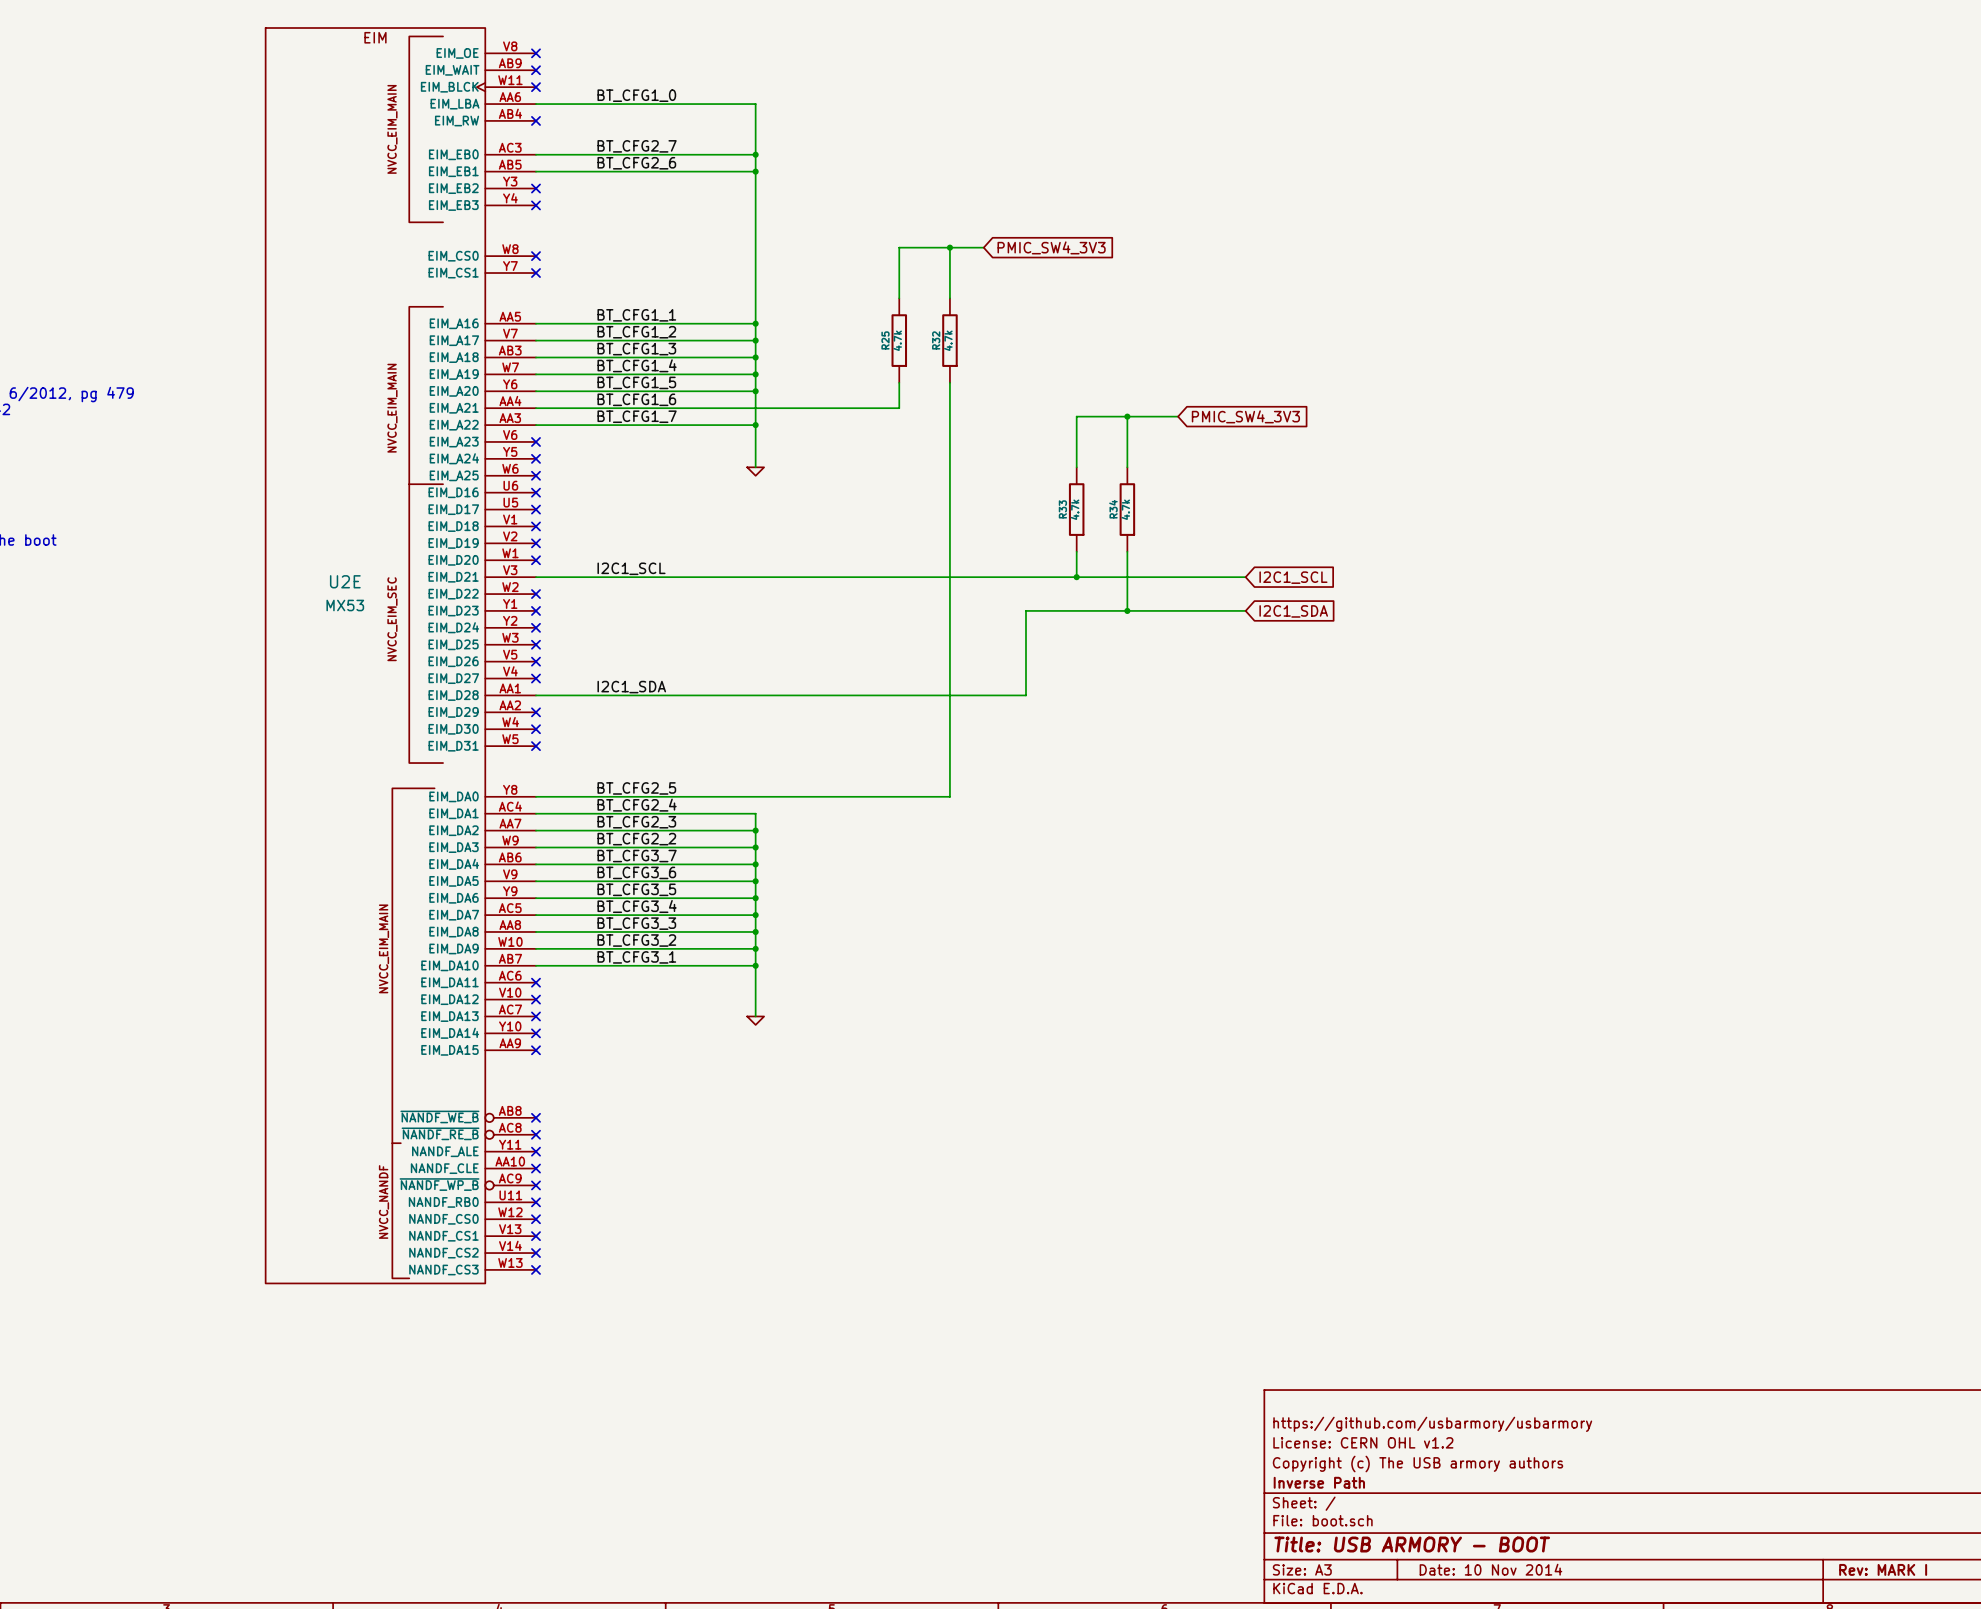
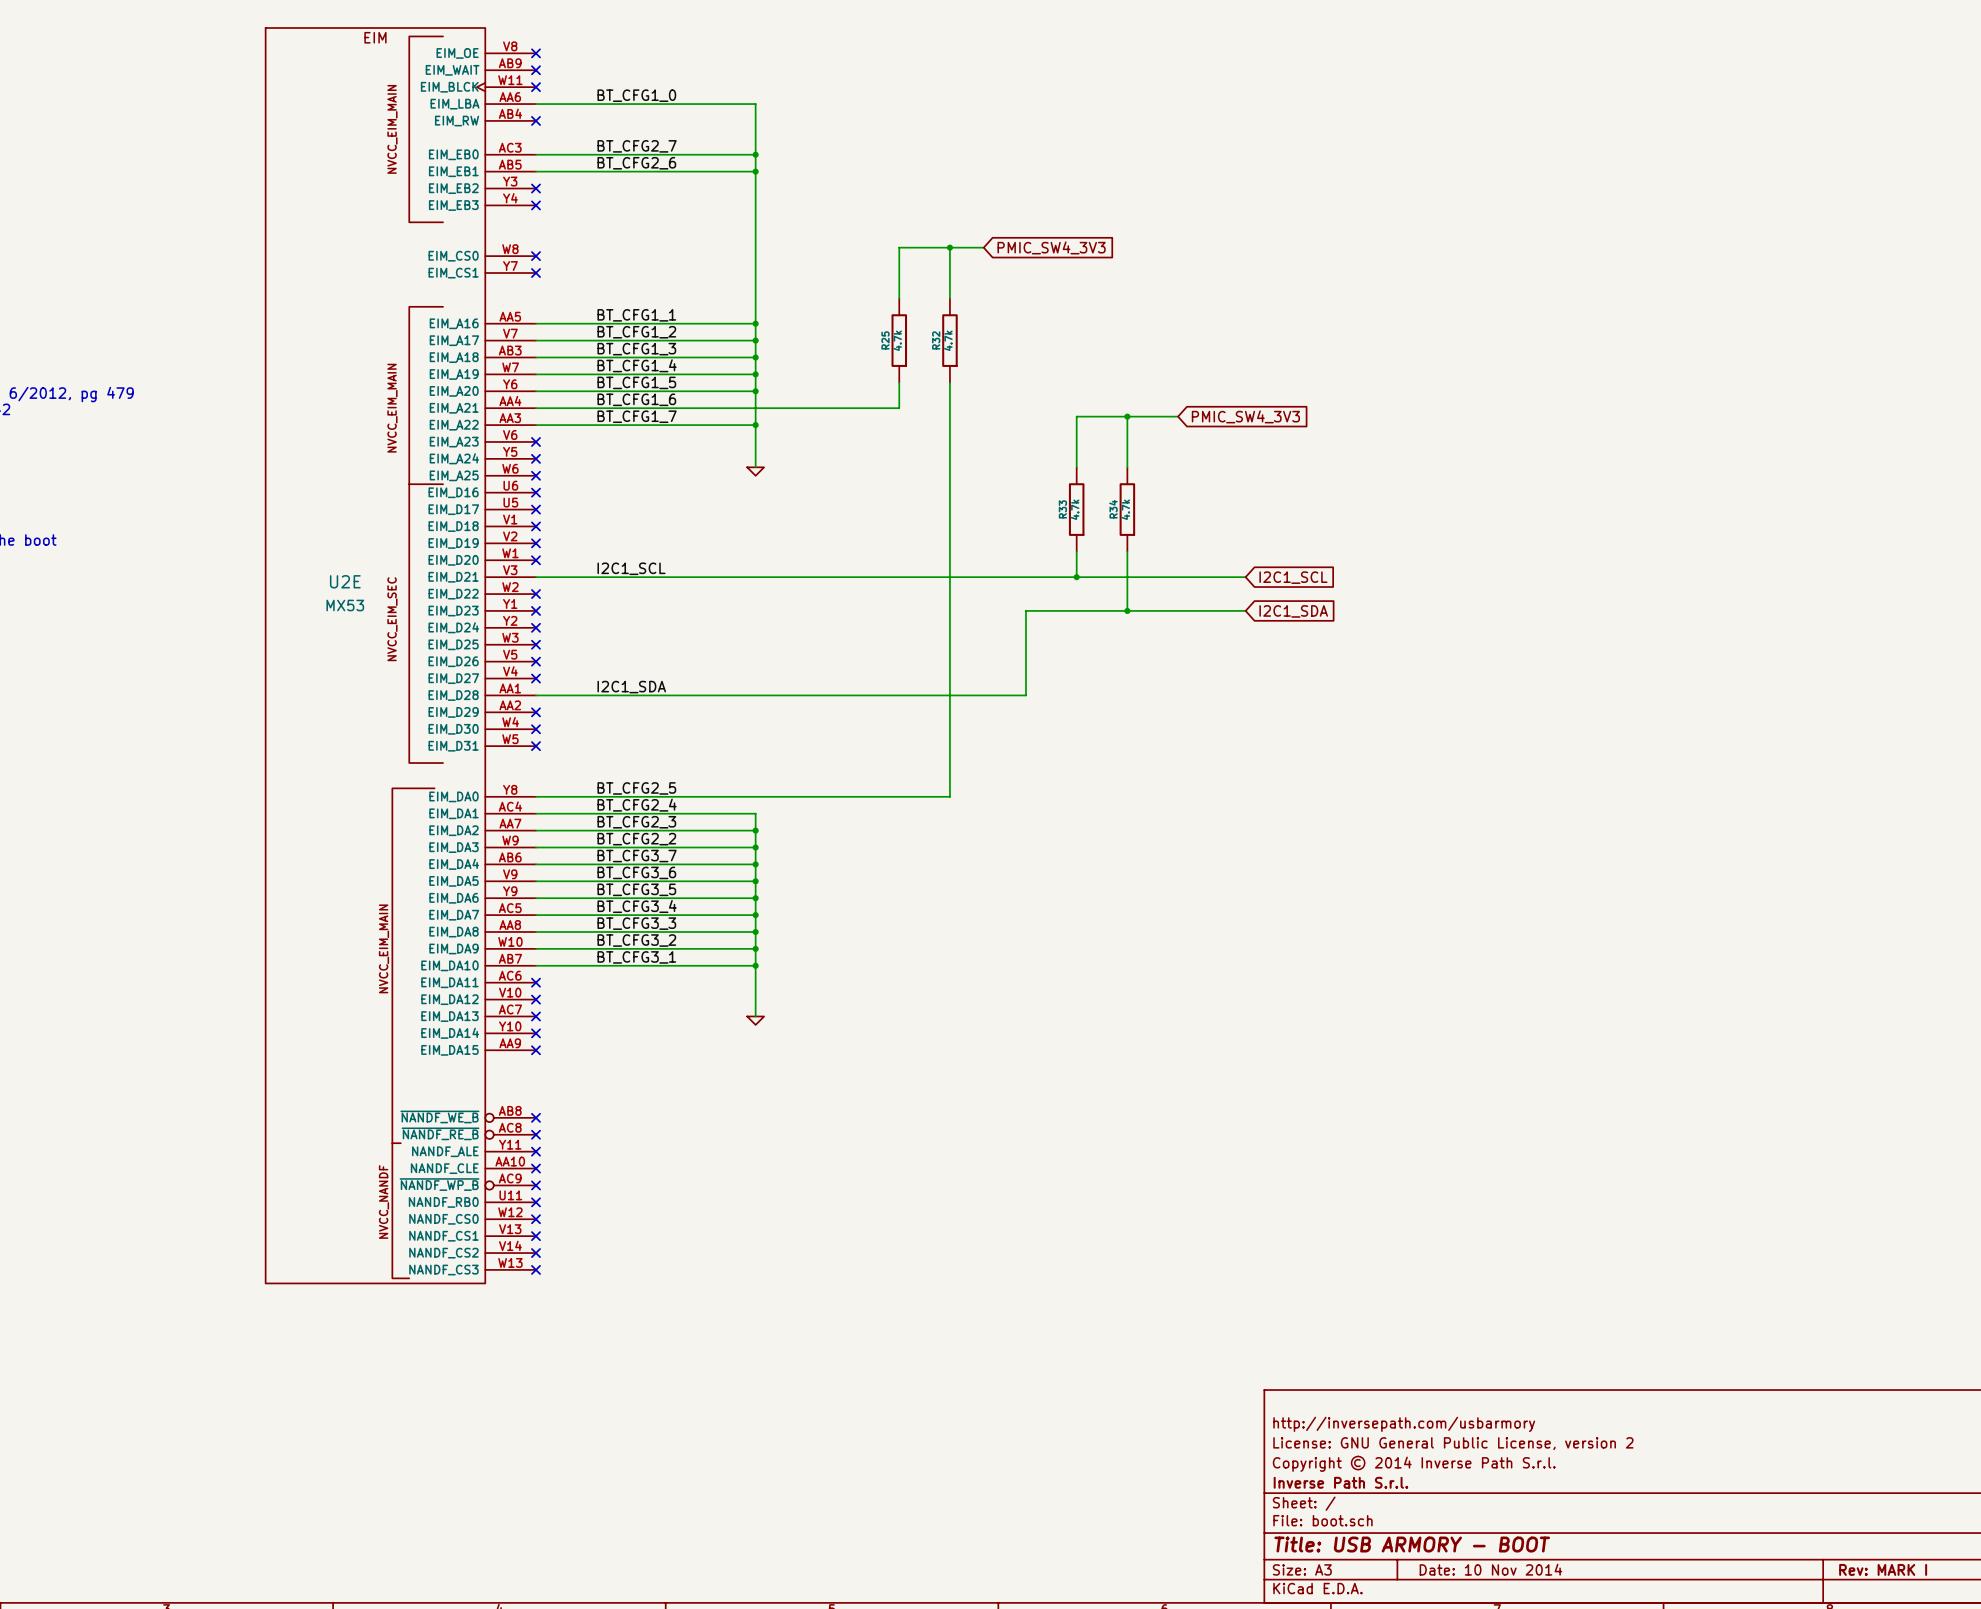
title block: https://github.com/usbarmory/usbarmory (1432, 1424) -> http://inversepath.com/usbarmory (1404, 1424)
title block: License: CERN OHL v1.2 (1363, 1442) -> License: GNU General Public License, version 2 (1453, 1443)
title block: Copyright (c) The USB armory authors (1418, 1464) -> Copyright © 2014 Inverse Path S.r.l. (1414, 1463)
title block: Inverse Path (1319, 1482) -> Inverse Path S.r.l. (1340, 1482)

